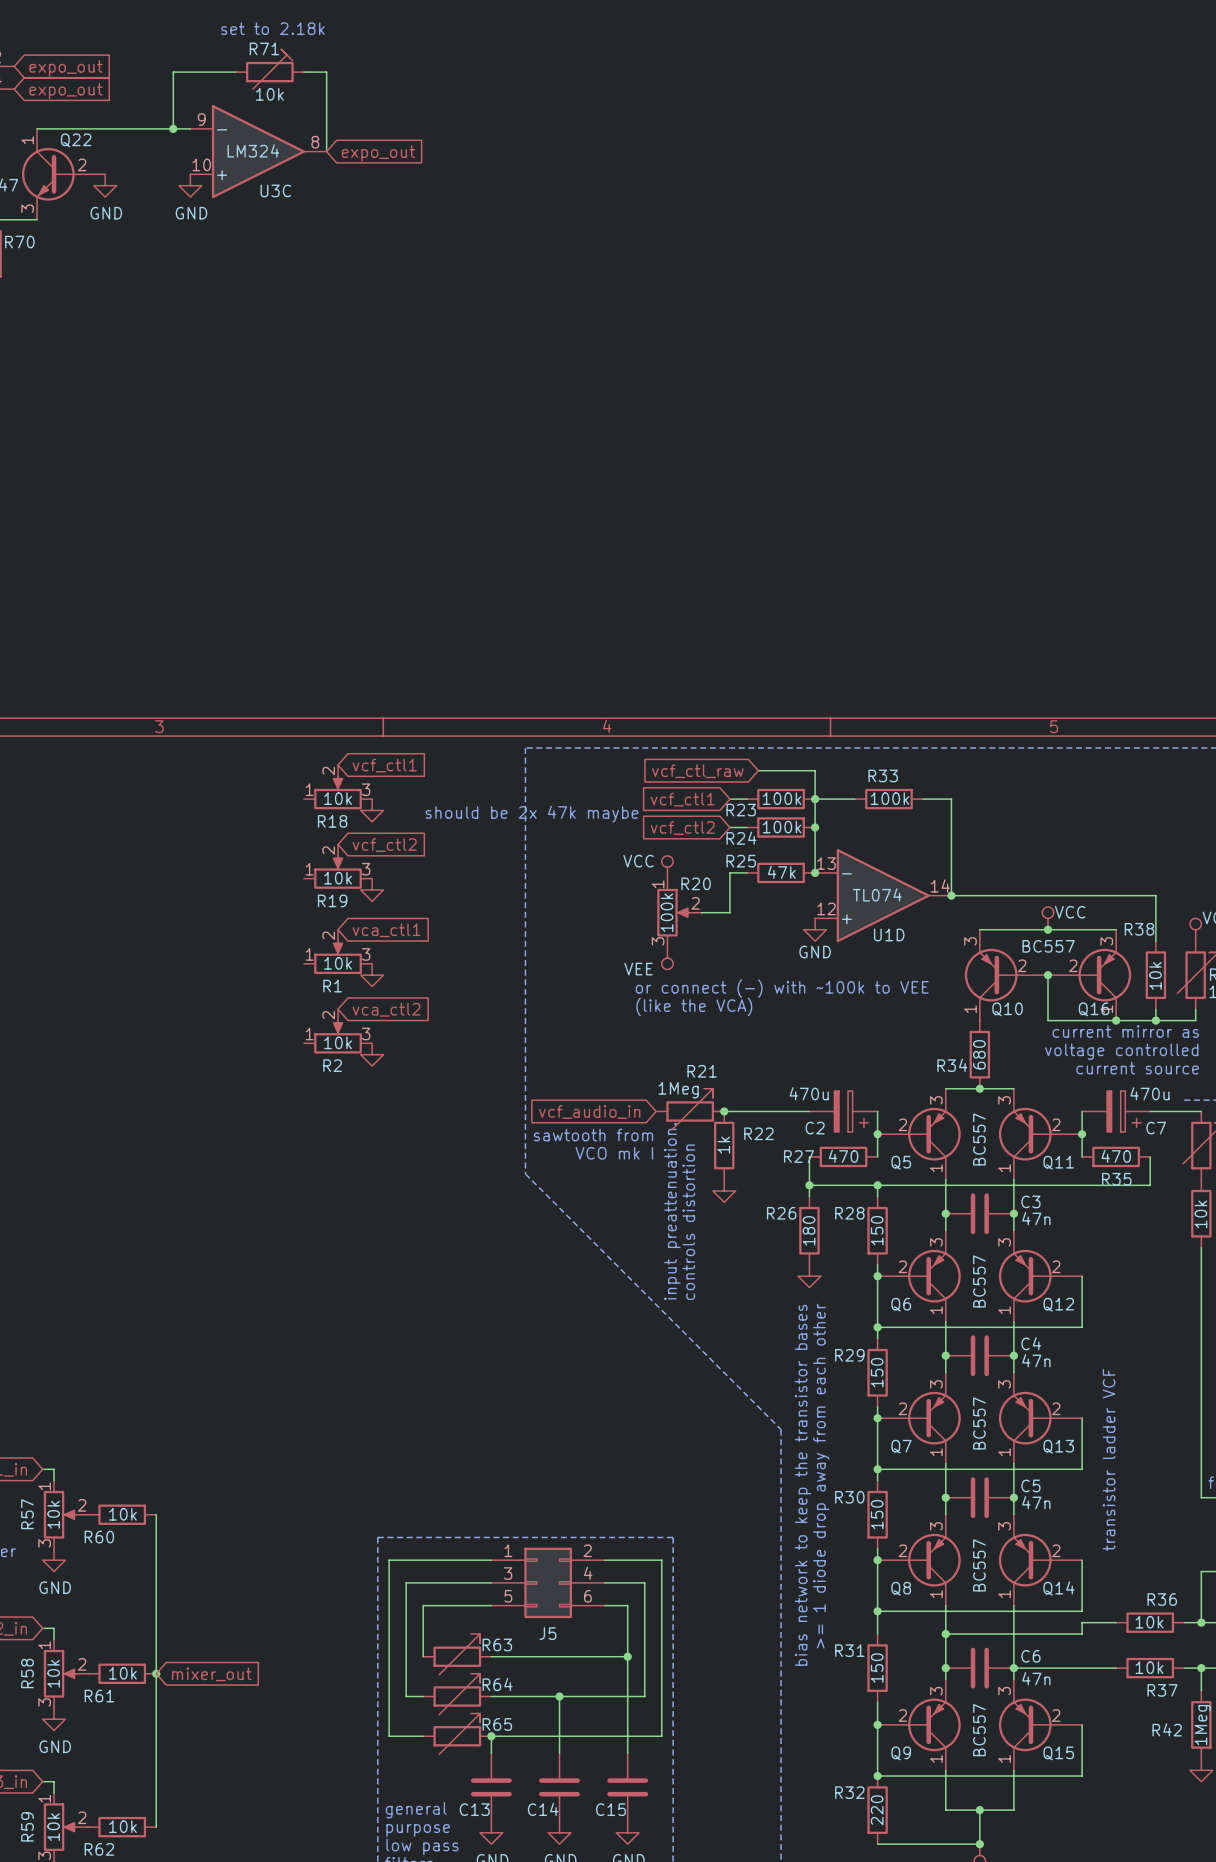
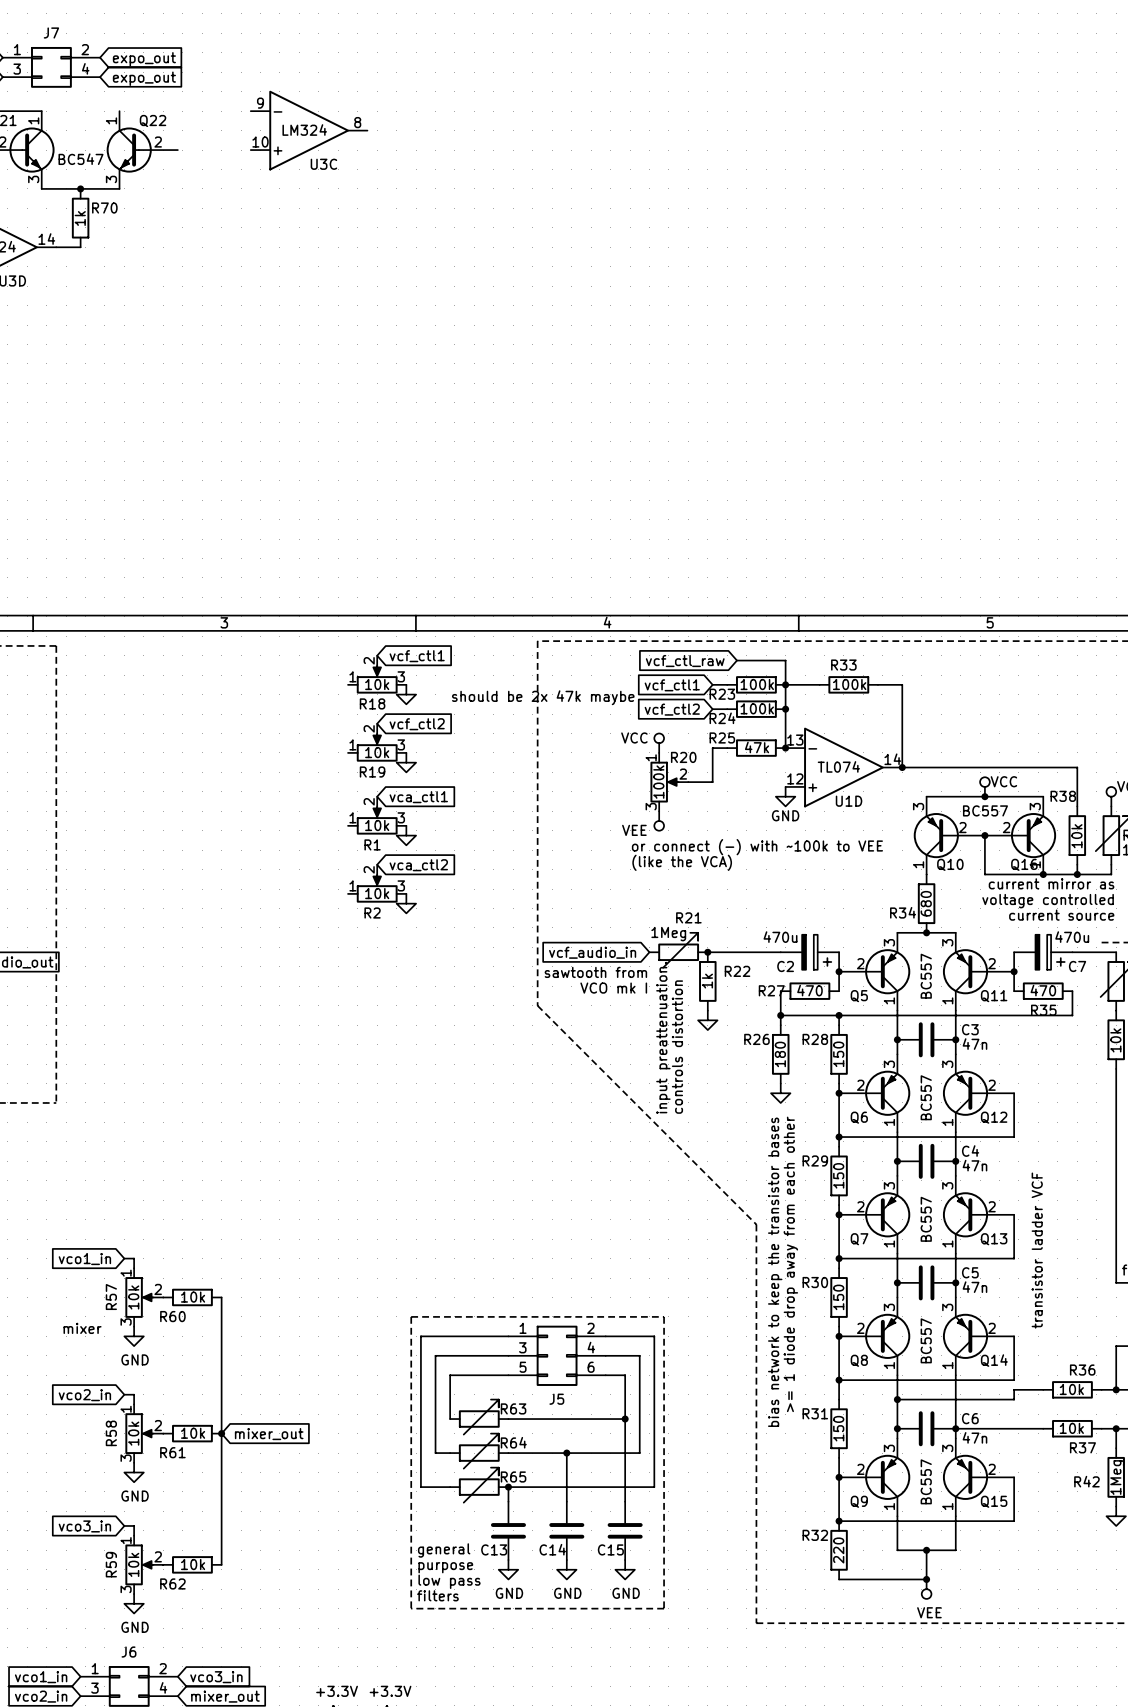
text: set to 2.18k (272, 28) -> none
R71: 10k (269, 69) -> none
wire: (235, 72) (173, 72) (173, 128) -> none
wire: (303, 72) (326, 72) (326, 151) -> none
wire: (37, 128) (190, 128) -> none
junction: (173, 128) -> none
global label: expo_out (378, 153) -> none
power symbol: GND (105, 185) -> none
power symbol: GND (190, 185) -> none

